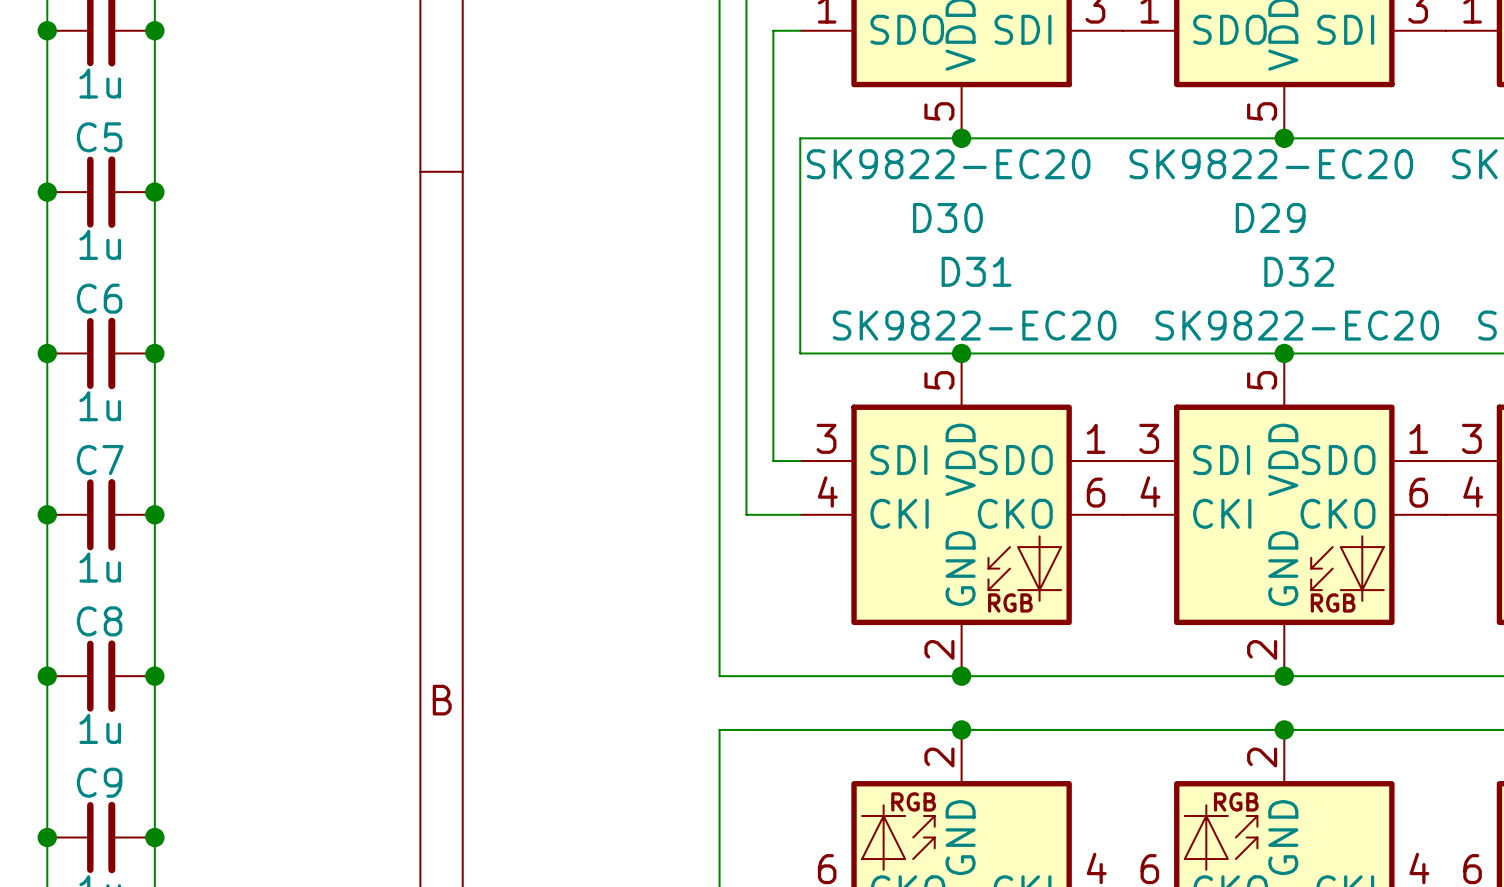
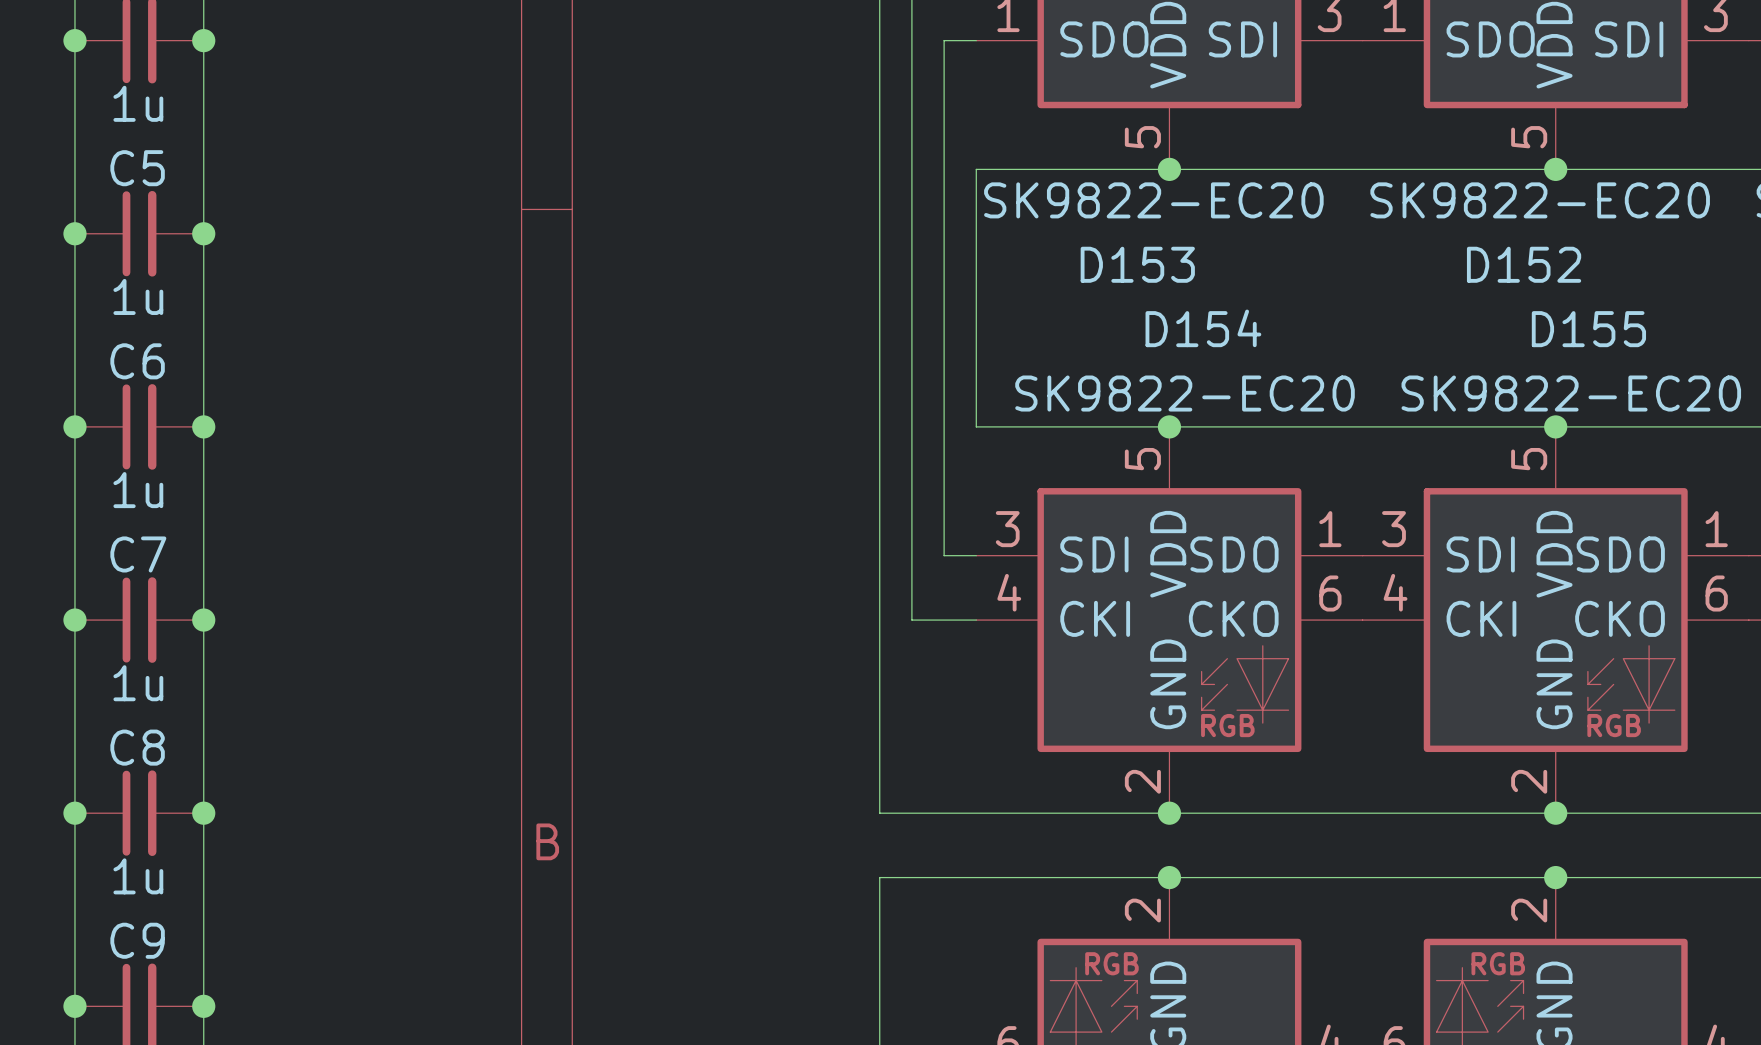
D30 name: D30 (947, 218) -> D153 (1137, 264)
D29 name: D29 (1270, 218) -> D152 (1524, 264)
D31 name: D31 (976, 271) -> D154 (1203, 328)
D32 name: D32 (1299, 271) -> D155 (1588, 329)

